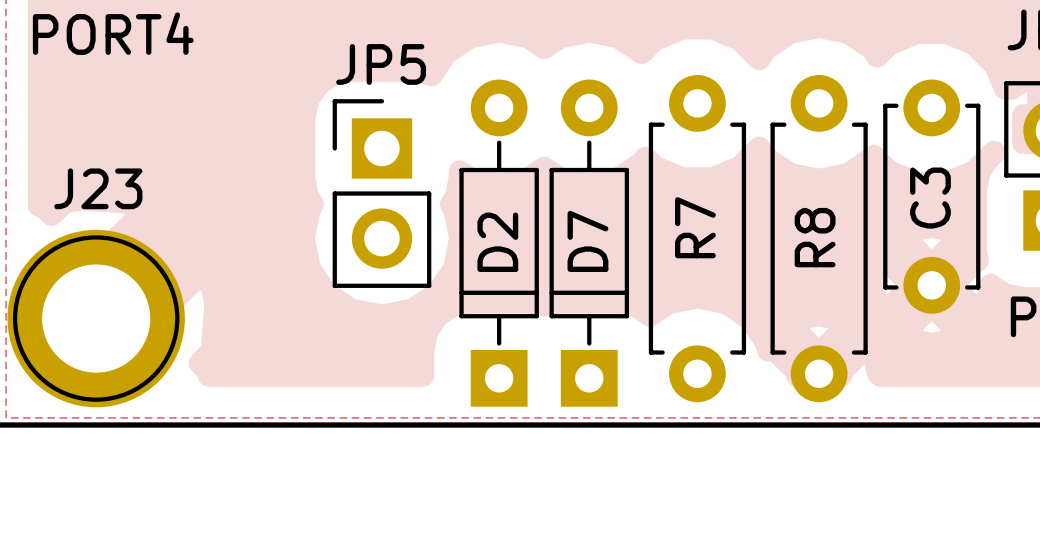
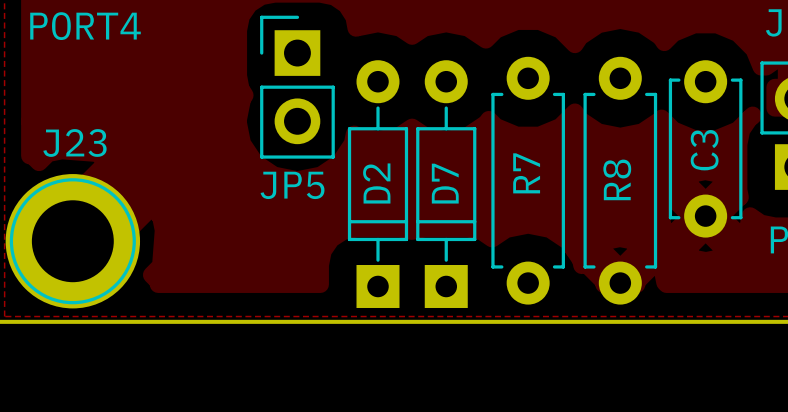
JP5 name position: JP5 (381, 64) -> JP5 (292, 185)
JP5 position: (381, 193) -> (297, 87)

